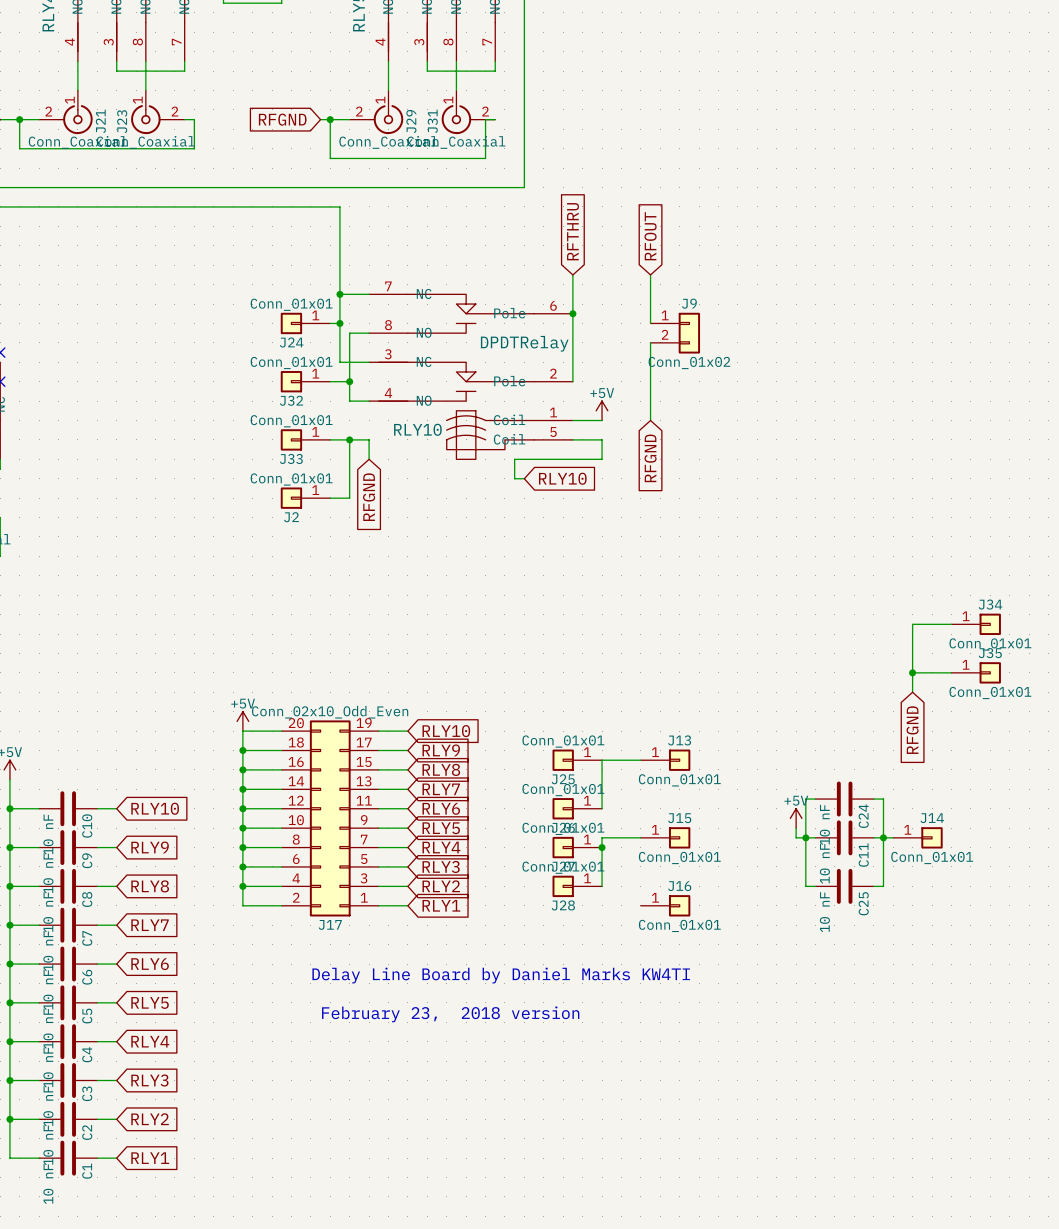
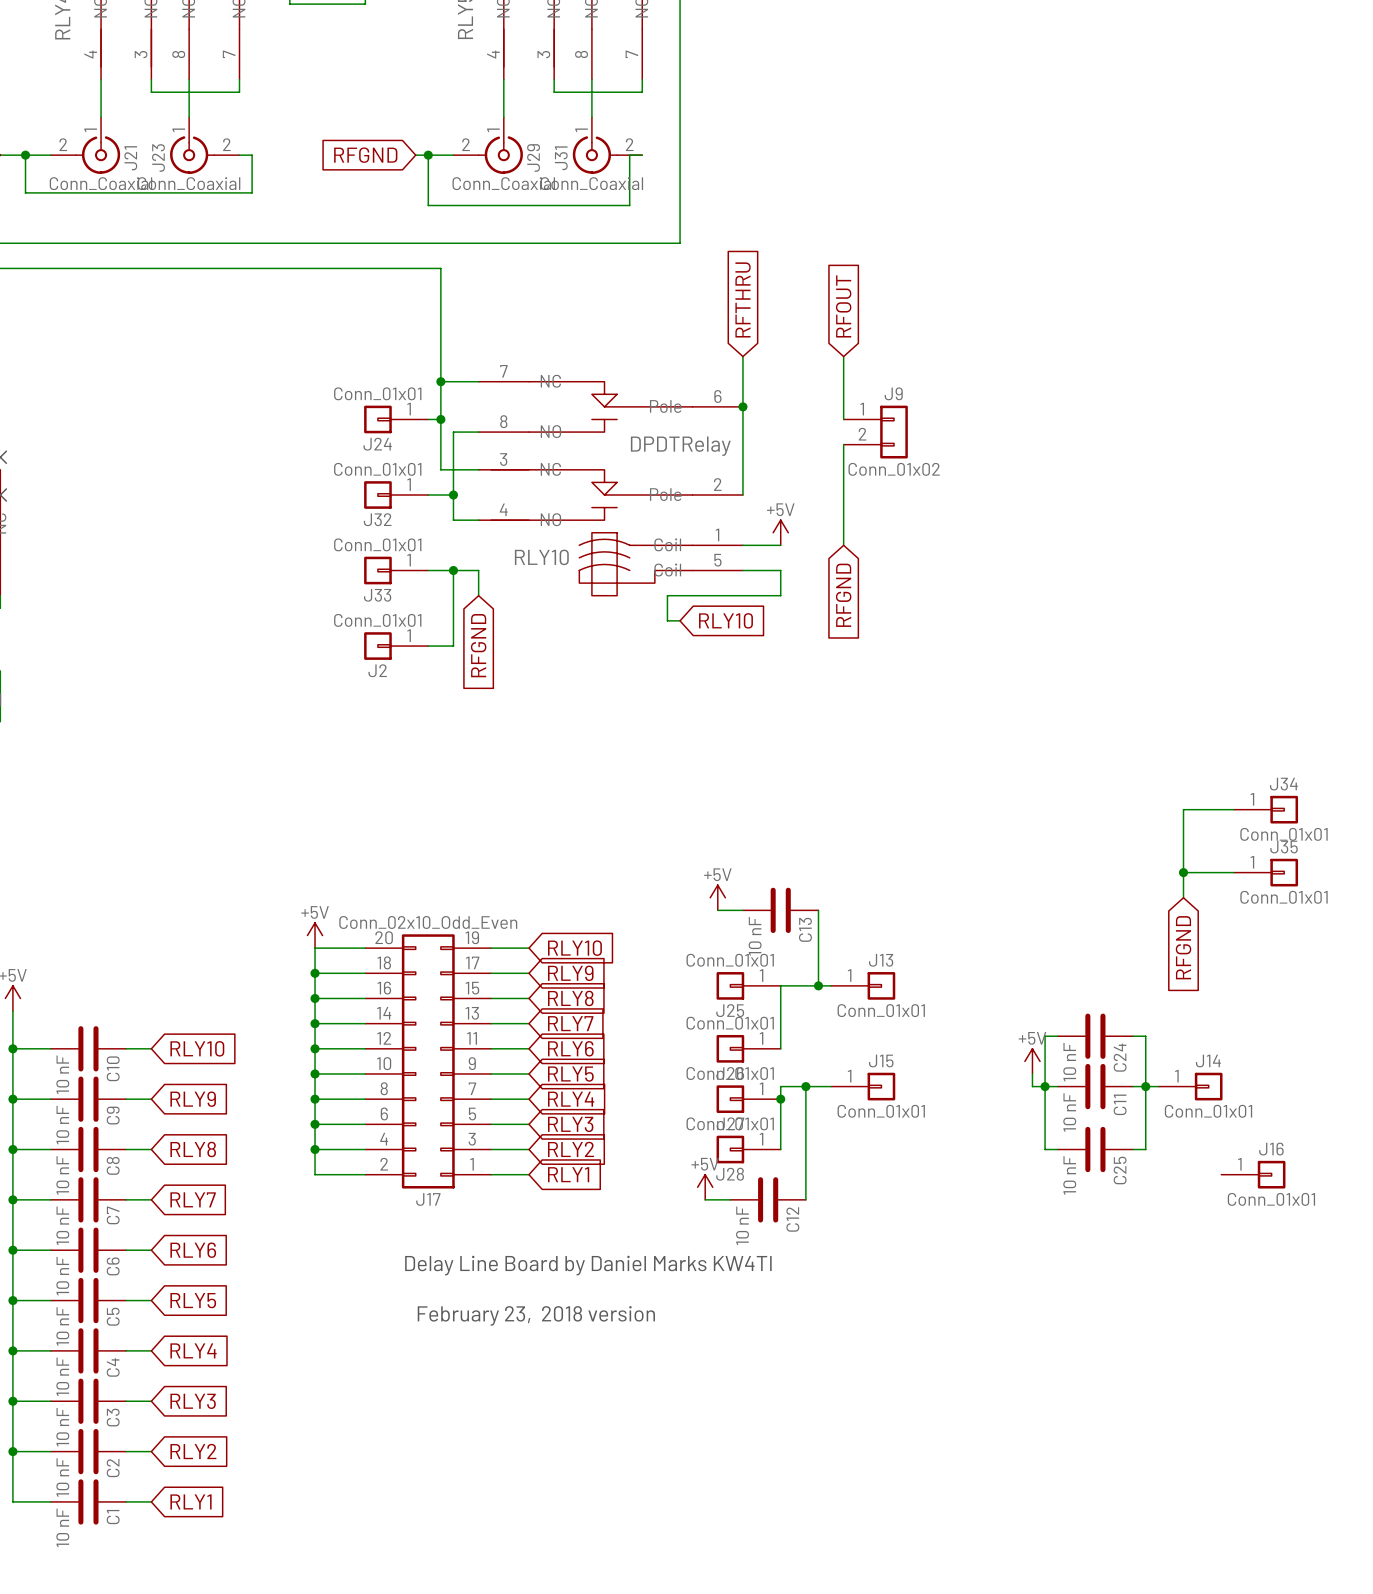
power symbol: none -> +5V (717, 897)
wire: none -> (717, 910) (742, 910)
C13: none -> 10 nF (780, 910)
wire: none -> (818, 910) (818, 985)
junction: none -> (818, 985)
wire: none -> (805, 1086) (805, 1199)
junction: none -> (805, 1086)
J16 position: (665, 905) -> (1253, 1174)
power symbol: none -> +5V (705, 1187)
wire: none -> (705, 1199) (730, 1199)
C12: none -> 10 nF (768, 1199)

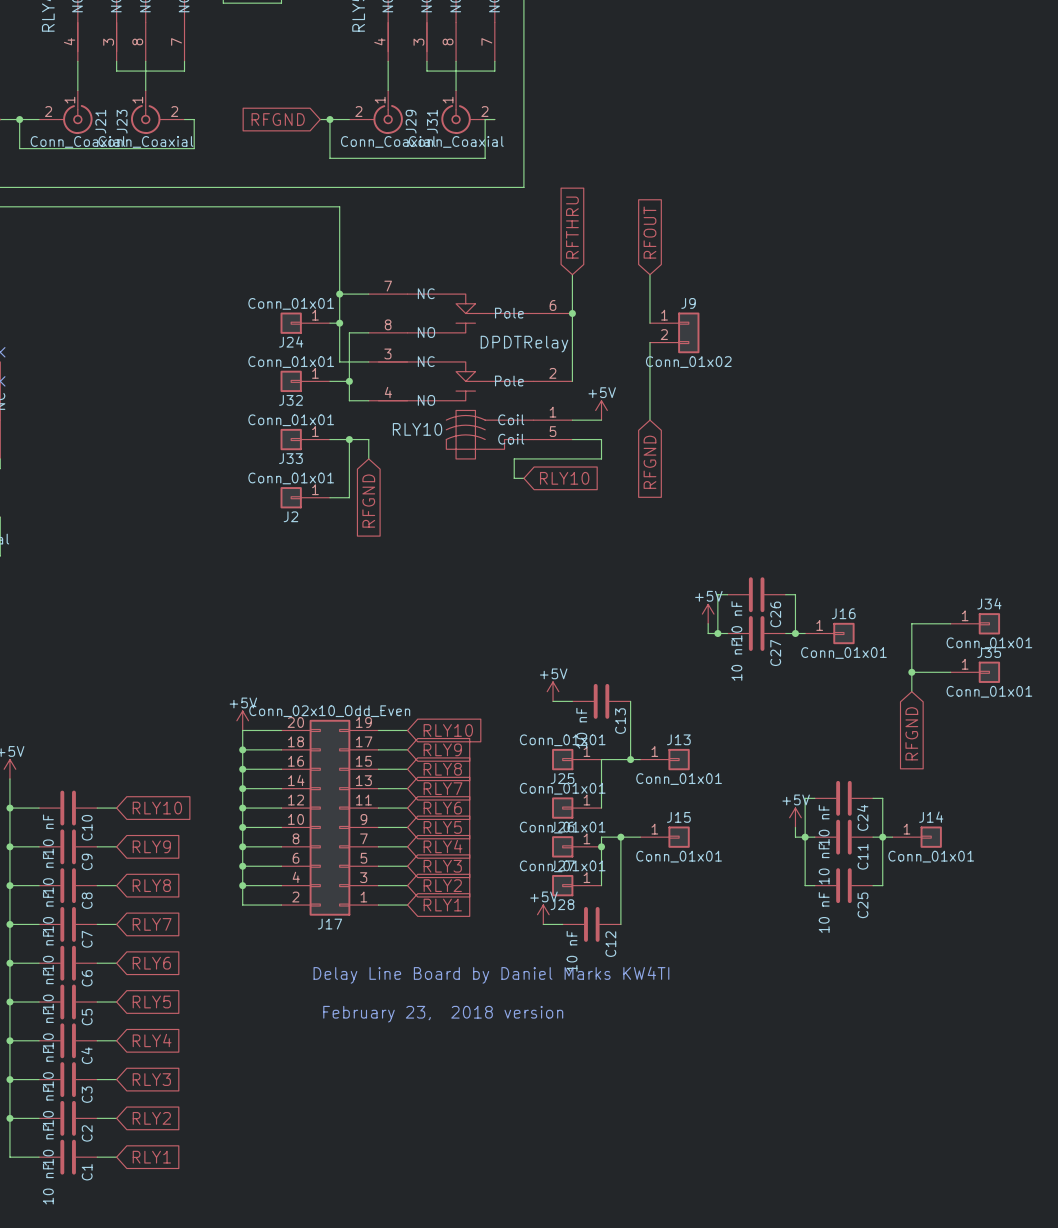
wire: none -> (727, 594) (717, 594) (717, 633)
C26: none -> 10 nF (756, 594)
wire: none -> (785, 594) (795, 594) (795, 633)
power symbol: none -> +5V (708, 614)
wire: none -> (708, 623) (708, 633) (727, 633)
junction: none -> (717, 633)
C27: none -> 10 nF (756, 633)
wire: none -> (785, 633) (805, 633)
junction: none -> (795, 633)
J16 position: (1253, 1174) -> (829, 633)

